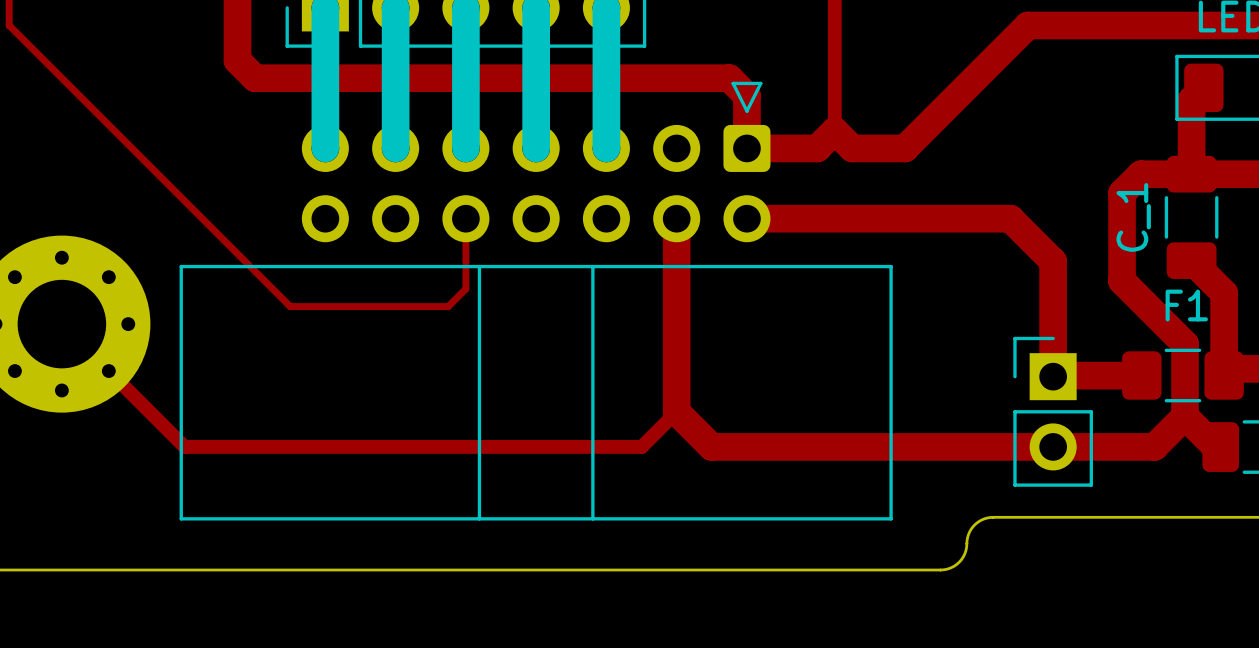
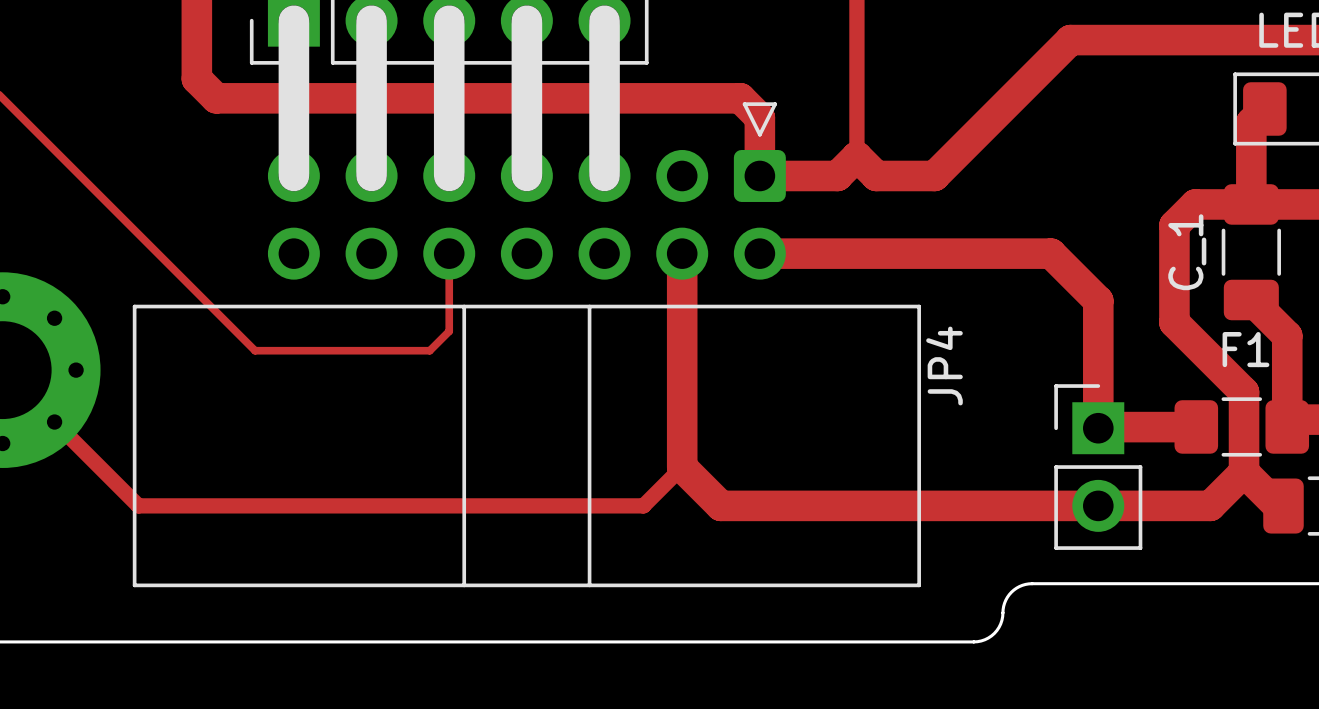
JP4 name: none -> JP4 (944, 366)

